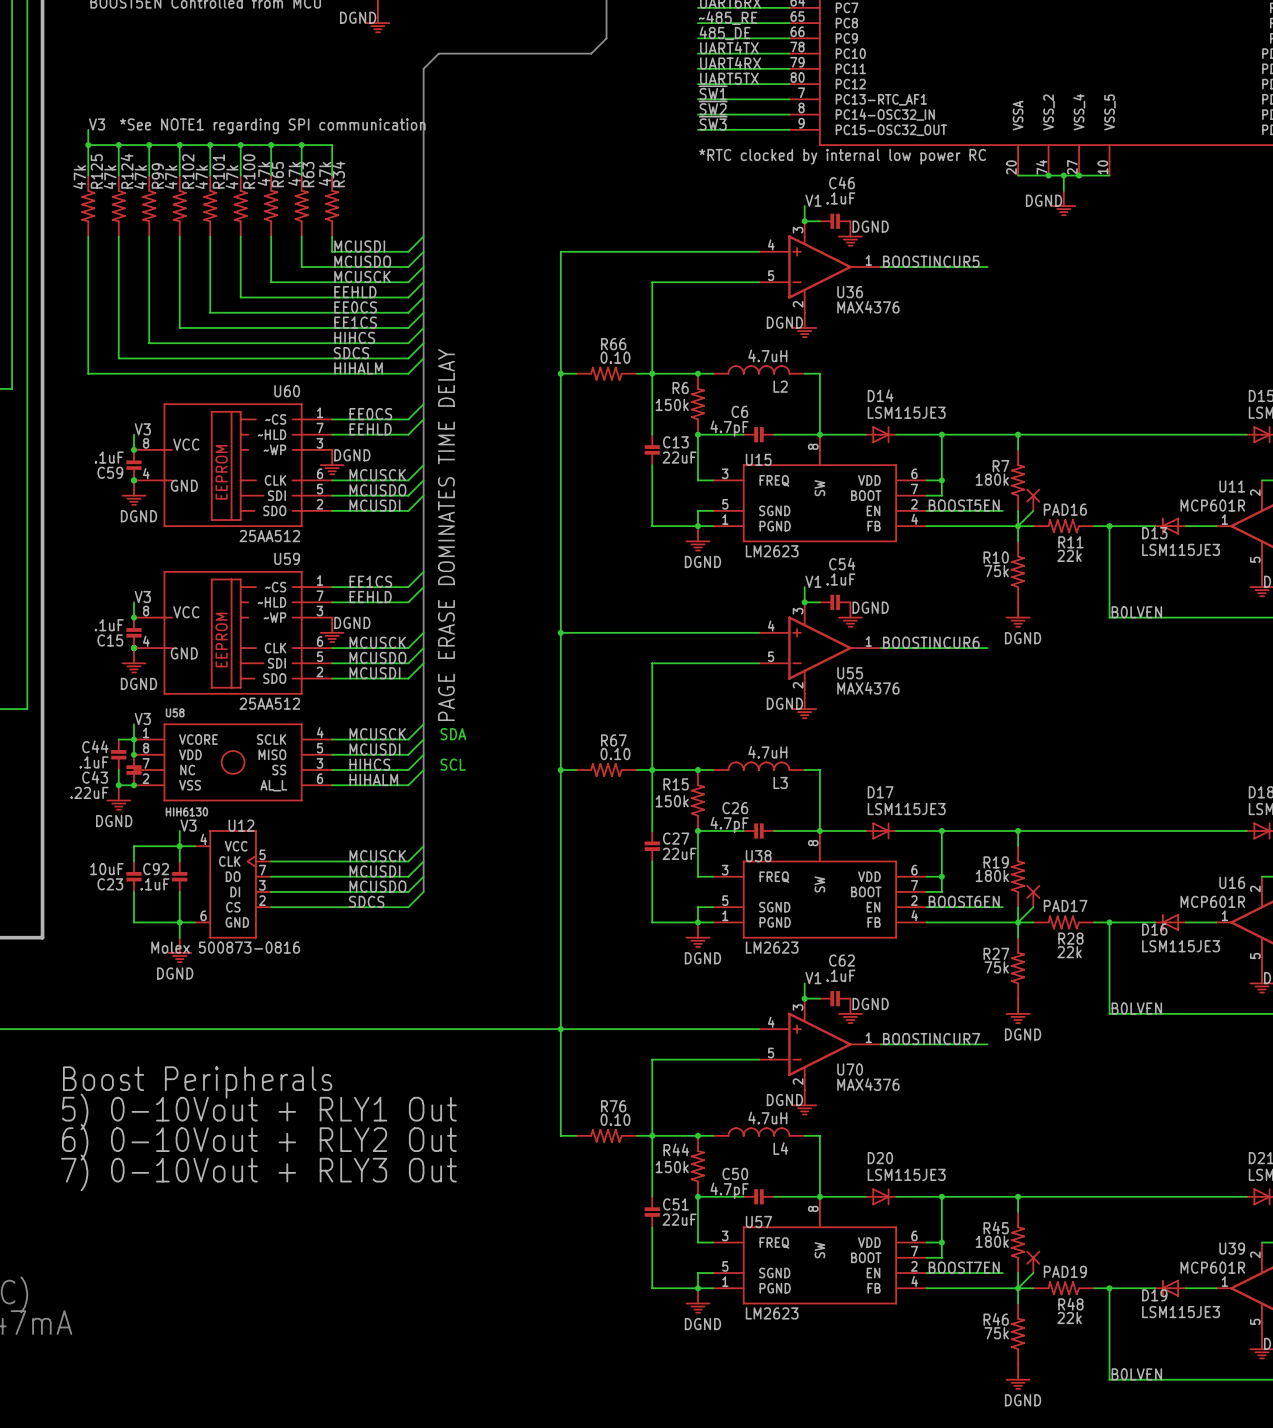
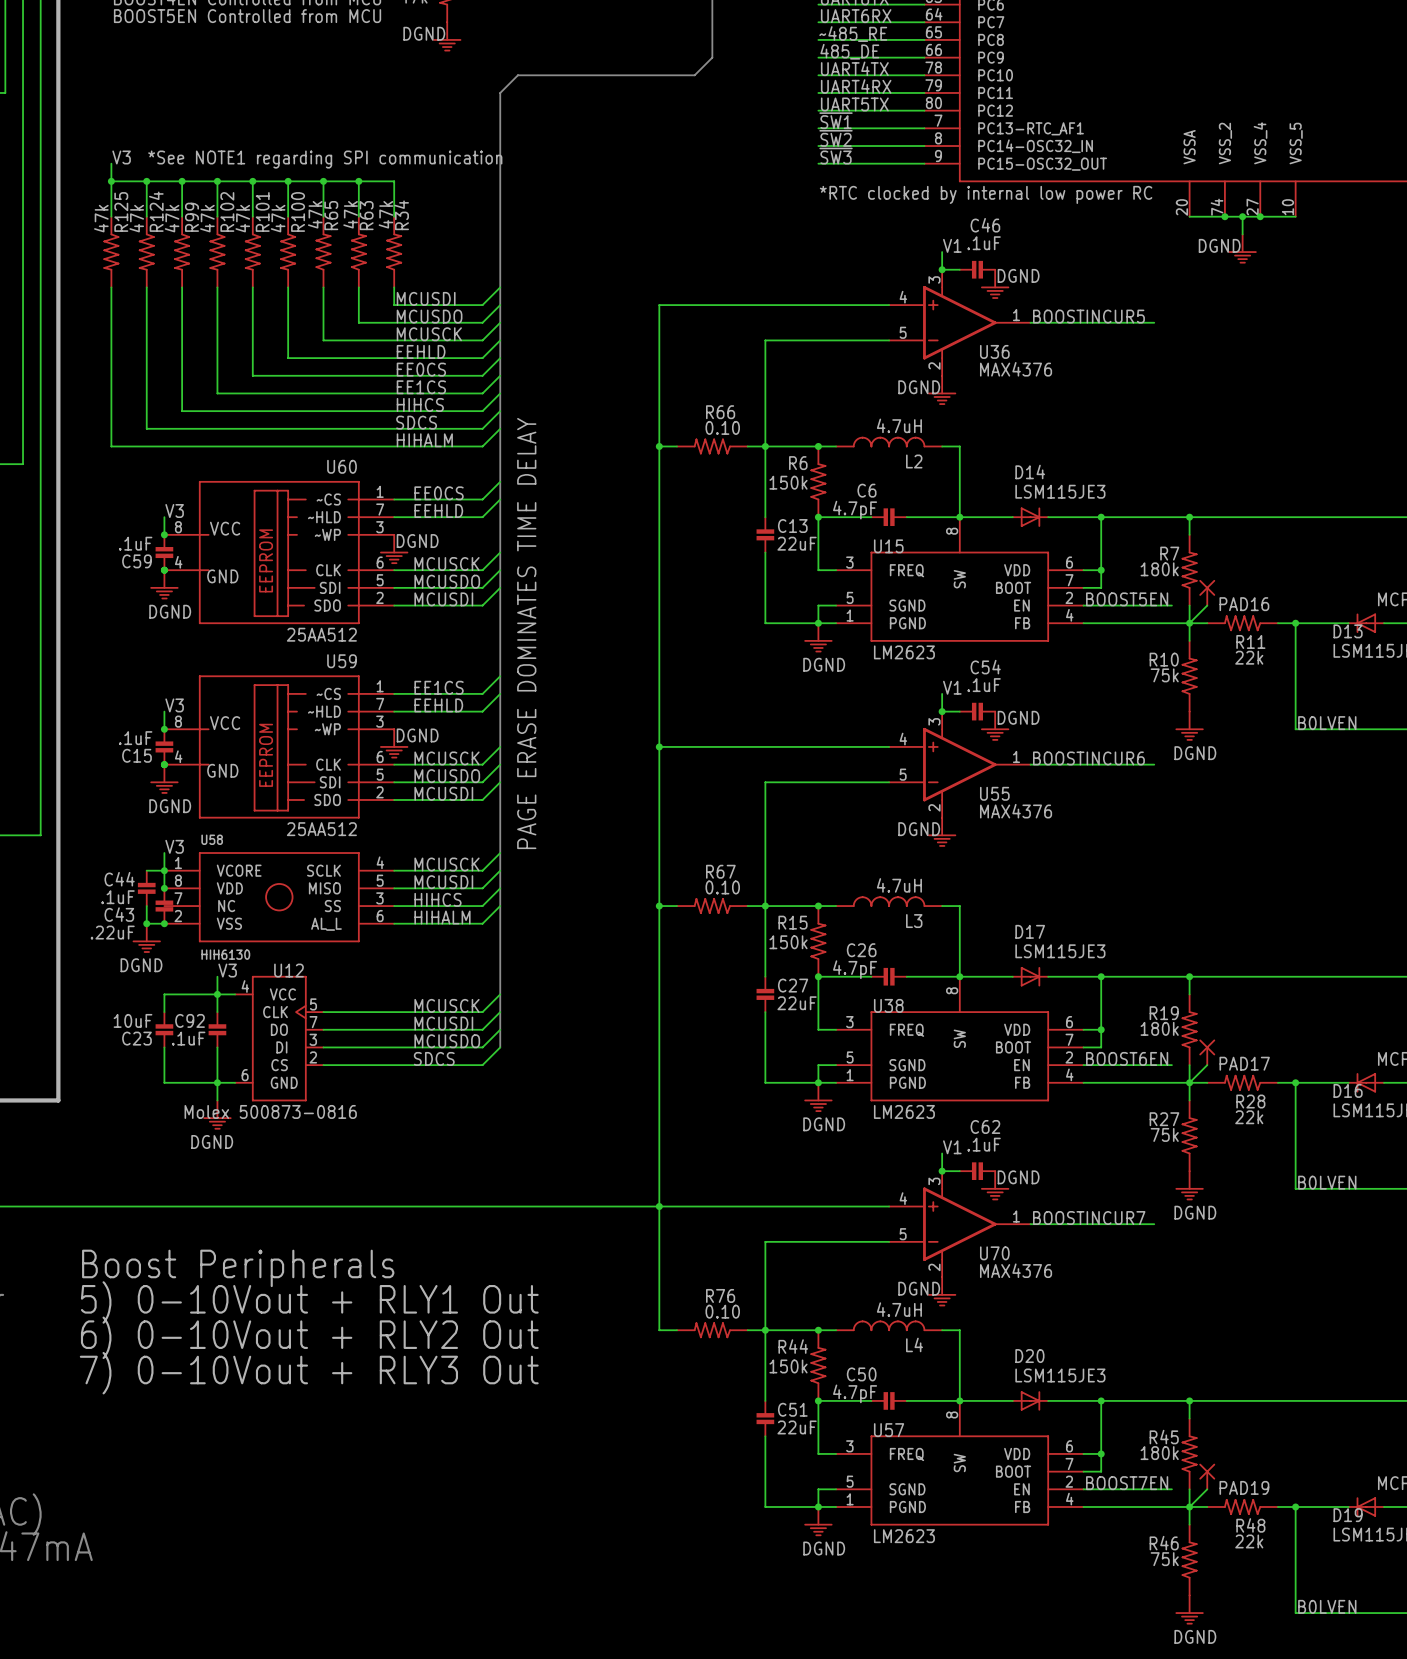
text: SDA (453, 734) -> none
text: SCL (453, 764) -> none

